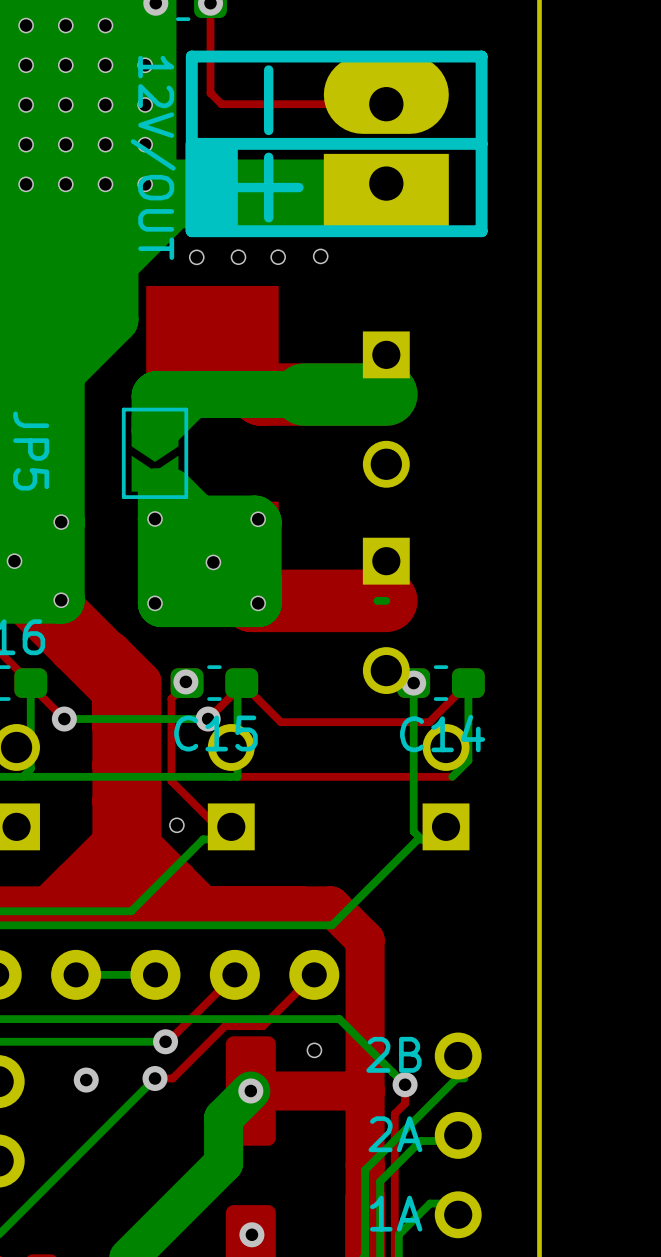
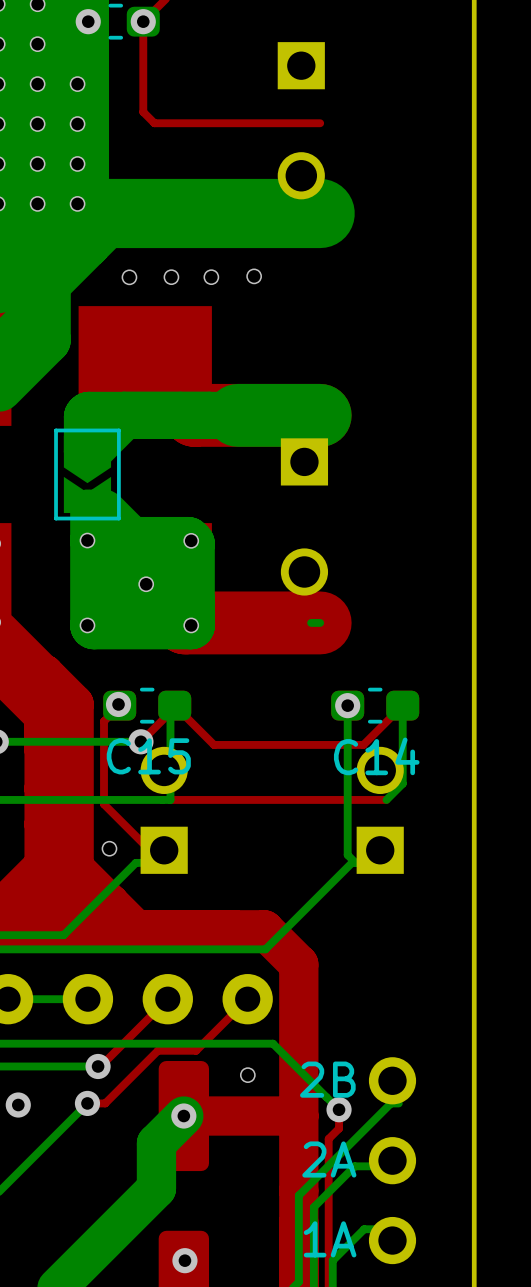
part: none -> (301, 120)
part: (336, 143) -> none
part: (386, 409) -> none
part: none -> (304, 516)
part: (386, 615) -> none

